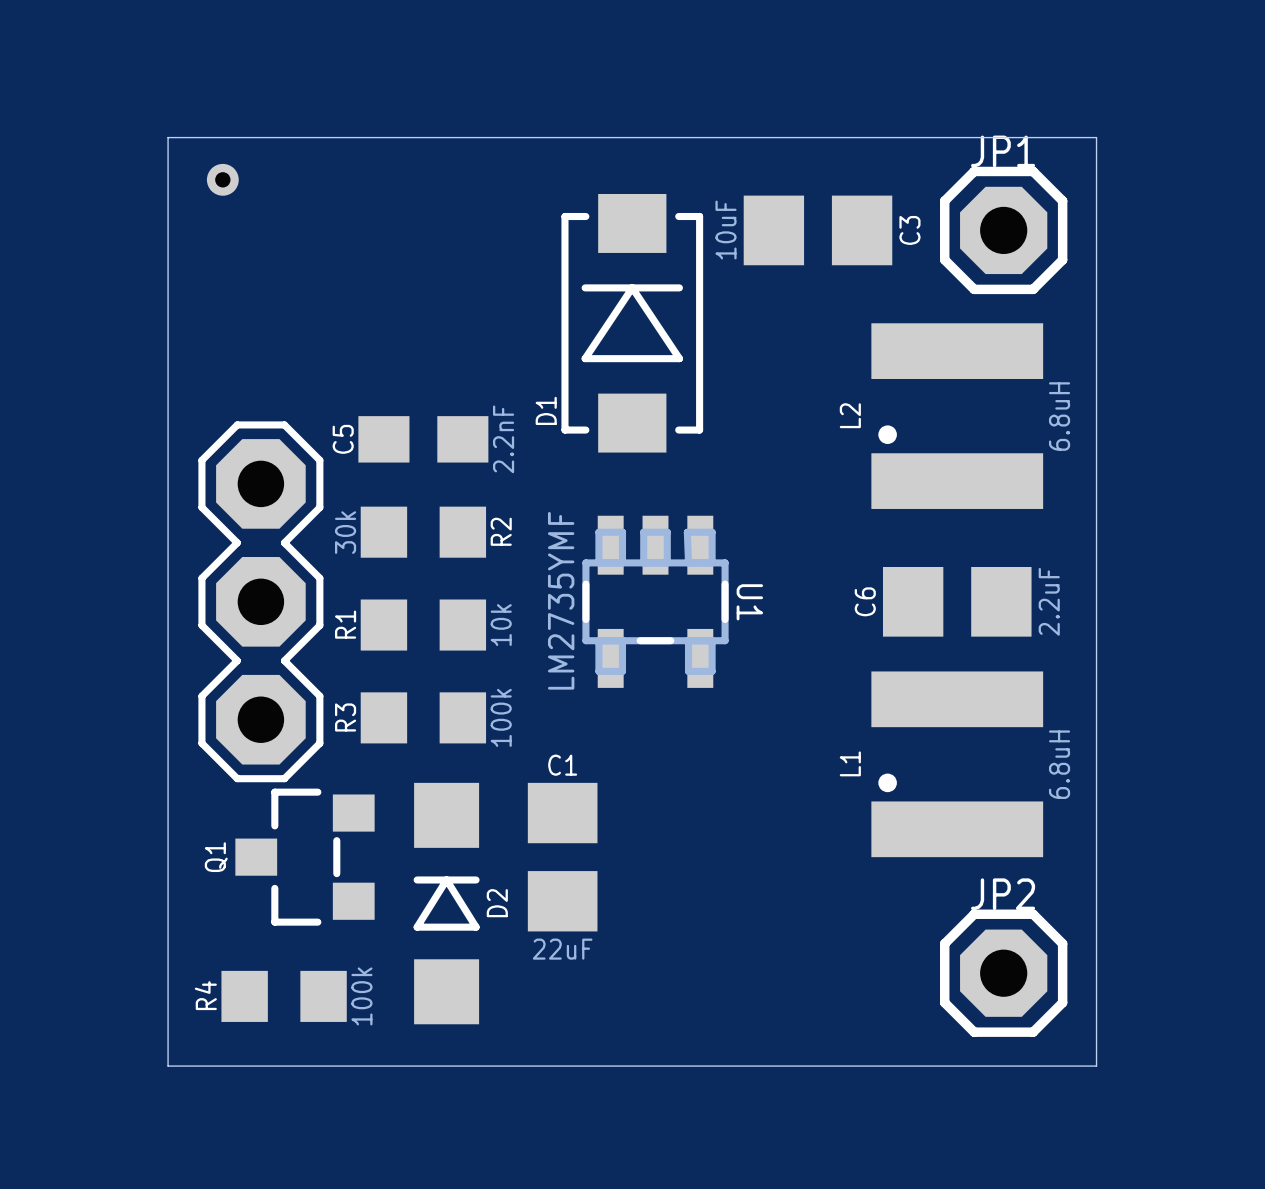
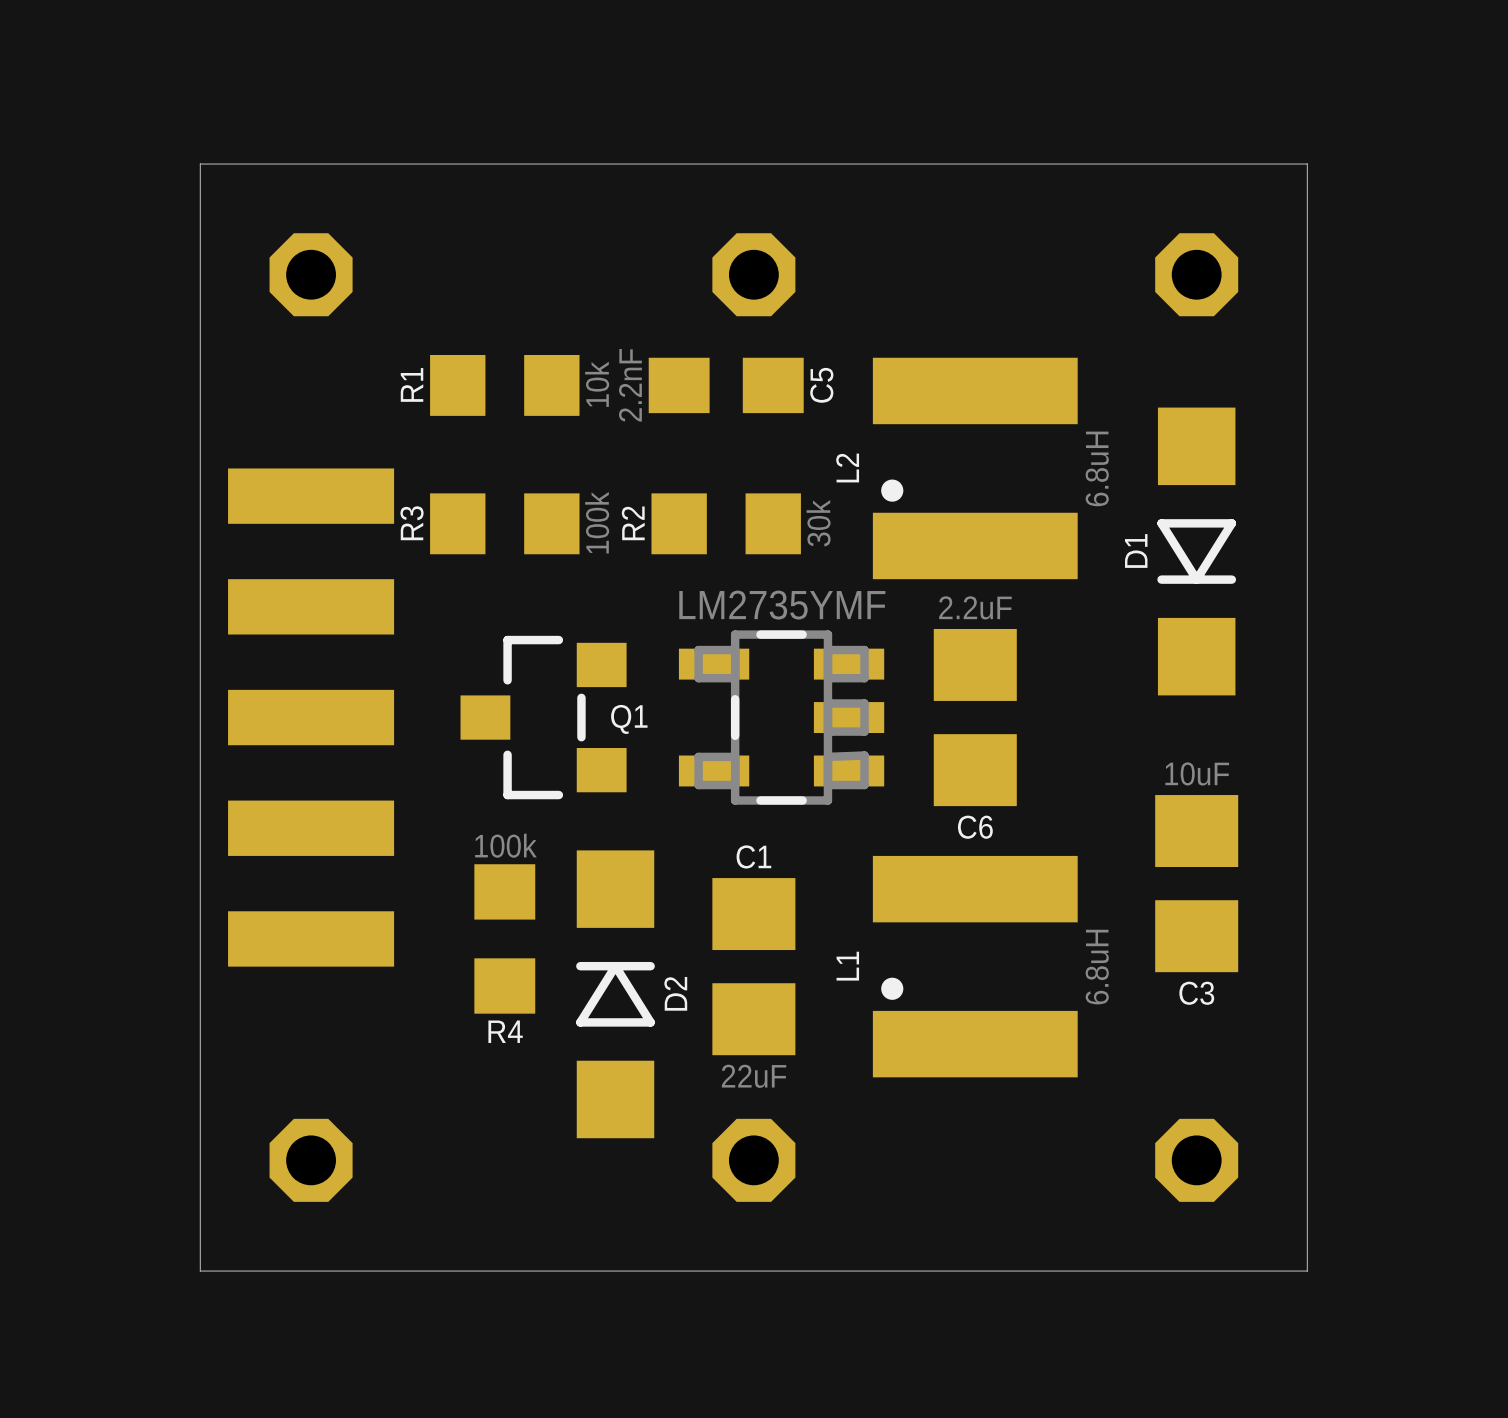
part: (222, 179) -> none
D1 footprint: [561, 193, 704, 453] -> [1157, 407, 1237, 696]
part: none -> (311, 274)
part: none -> (753, 274)
C3 rotation: 0° (817, 230) -> 90° clockwise (1196, 883)
C3 position: (817, 230) -> (1196, 883)
JP1: (1003, 230) -> none
part: none -> (1196, 274)
L2 position: (957, 416) -> (975, 468)
part footprint: [198, 421, 324, 783] -> [228, 468, 395, 967]
C5 name position: C5 (343, 439) -> C5 (821, 385)
C5 position: (423, 439) -> (726, 385)
C5 value position: 2.2nF (503, 439) -> 2.2nF (630, 385)
R2 name position: R2 (501, 531) -> R2 (633, 523)
R2 value position: 30k (345, 532) -> 30k (818, 523)
R2 position: (423, 532) -> (726, 523)
U1: LM2735YMF (655, 601) -> none
part: none -> LM2735YMF (781, 717)
C6 name position: C6 (865, 601) -> C6 (975, 827)
C6 rotation: 0° (957, 601) -> 90° clockwise (975, 717)
C6 position: (957, 601) -> (975, 717)
C6 value position: 2.2uF (1049, 601) -> 2.2uF (975, 607)
R1 position: (423, 625) -> (504, 385)
R3 position: (423, 717) -> (504, 523)
L1 position: (957, 764) -> (975, 966)
Q1 name rotation: 0° (216, 857) -> 90° clockwise (629, 719)
Q1 name position: Q1 (216, 857) -> Q1 (629, 719)
Q1 position: (305, 857) -> (543, 717)
C1 position: (562, 857) -> (753, 966)
D2 position: (446, 903) -> (615, 994)
part: none -> (311, 1160)
part: none -> (753, 1160)
JP2: (1003, 973) -> none
part: none -> (1196, 1160)
R4 name position: R4 (205, 995) -> R4 (505, 1031)
R4 rotation: 0° (284, 996) -> 90° clockwise (504, 938)
R4 position: (284, 996) -> (504, 938)
R4 value position: 100k (361, 996) -> 100k (505, 845)

